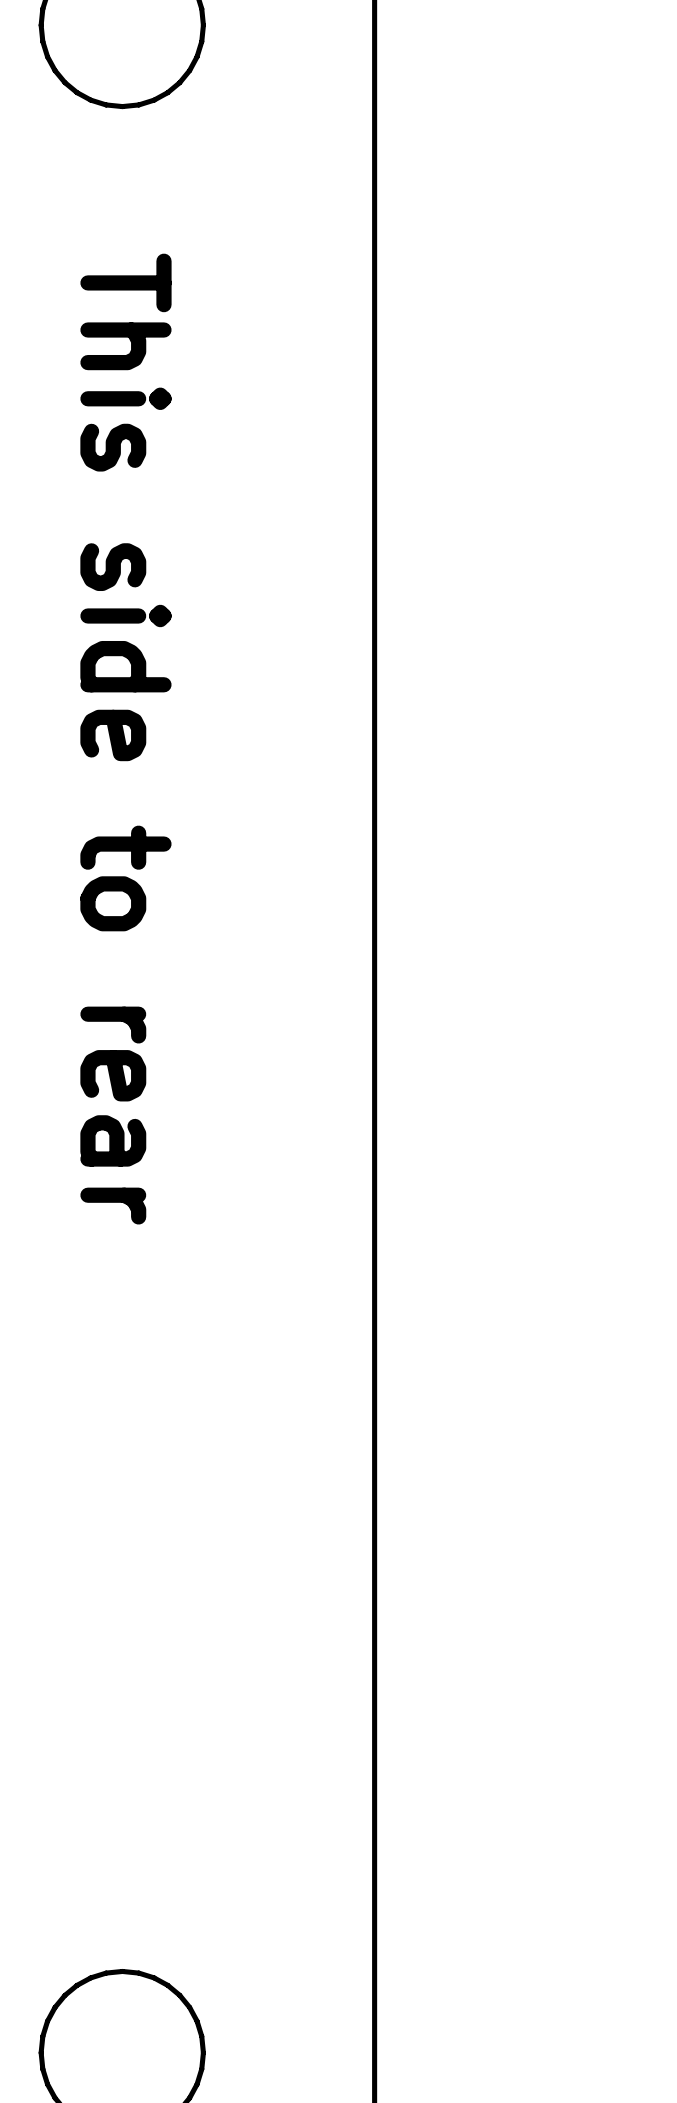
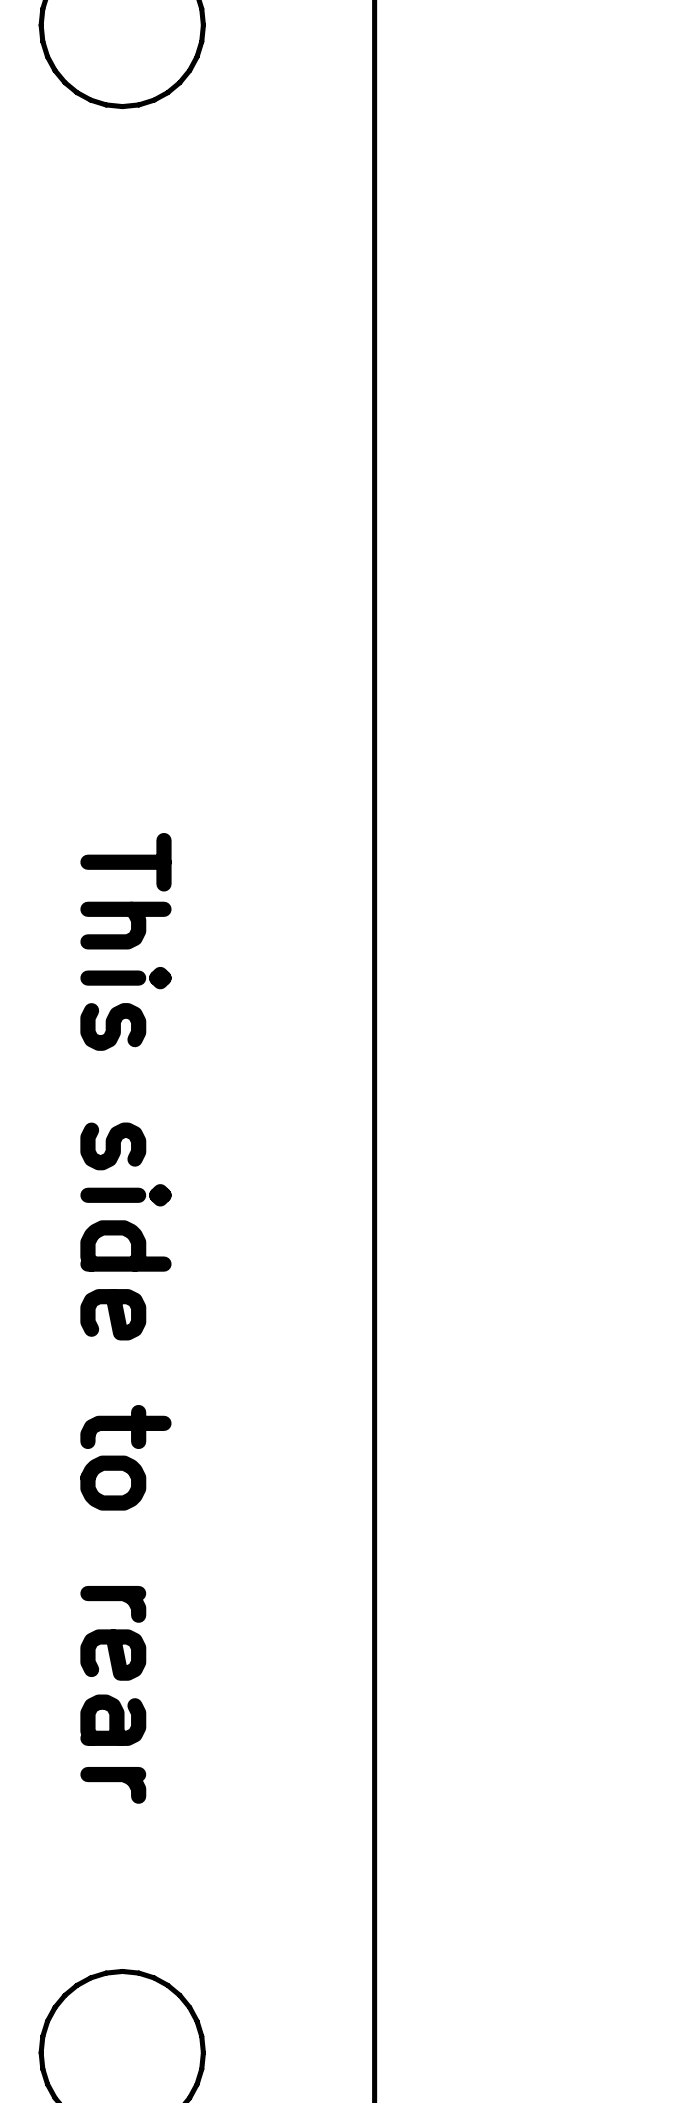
text position: This side to rear (125, 739) -> This side to rear (125, 1318)

